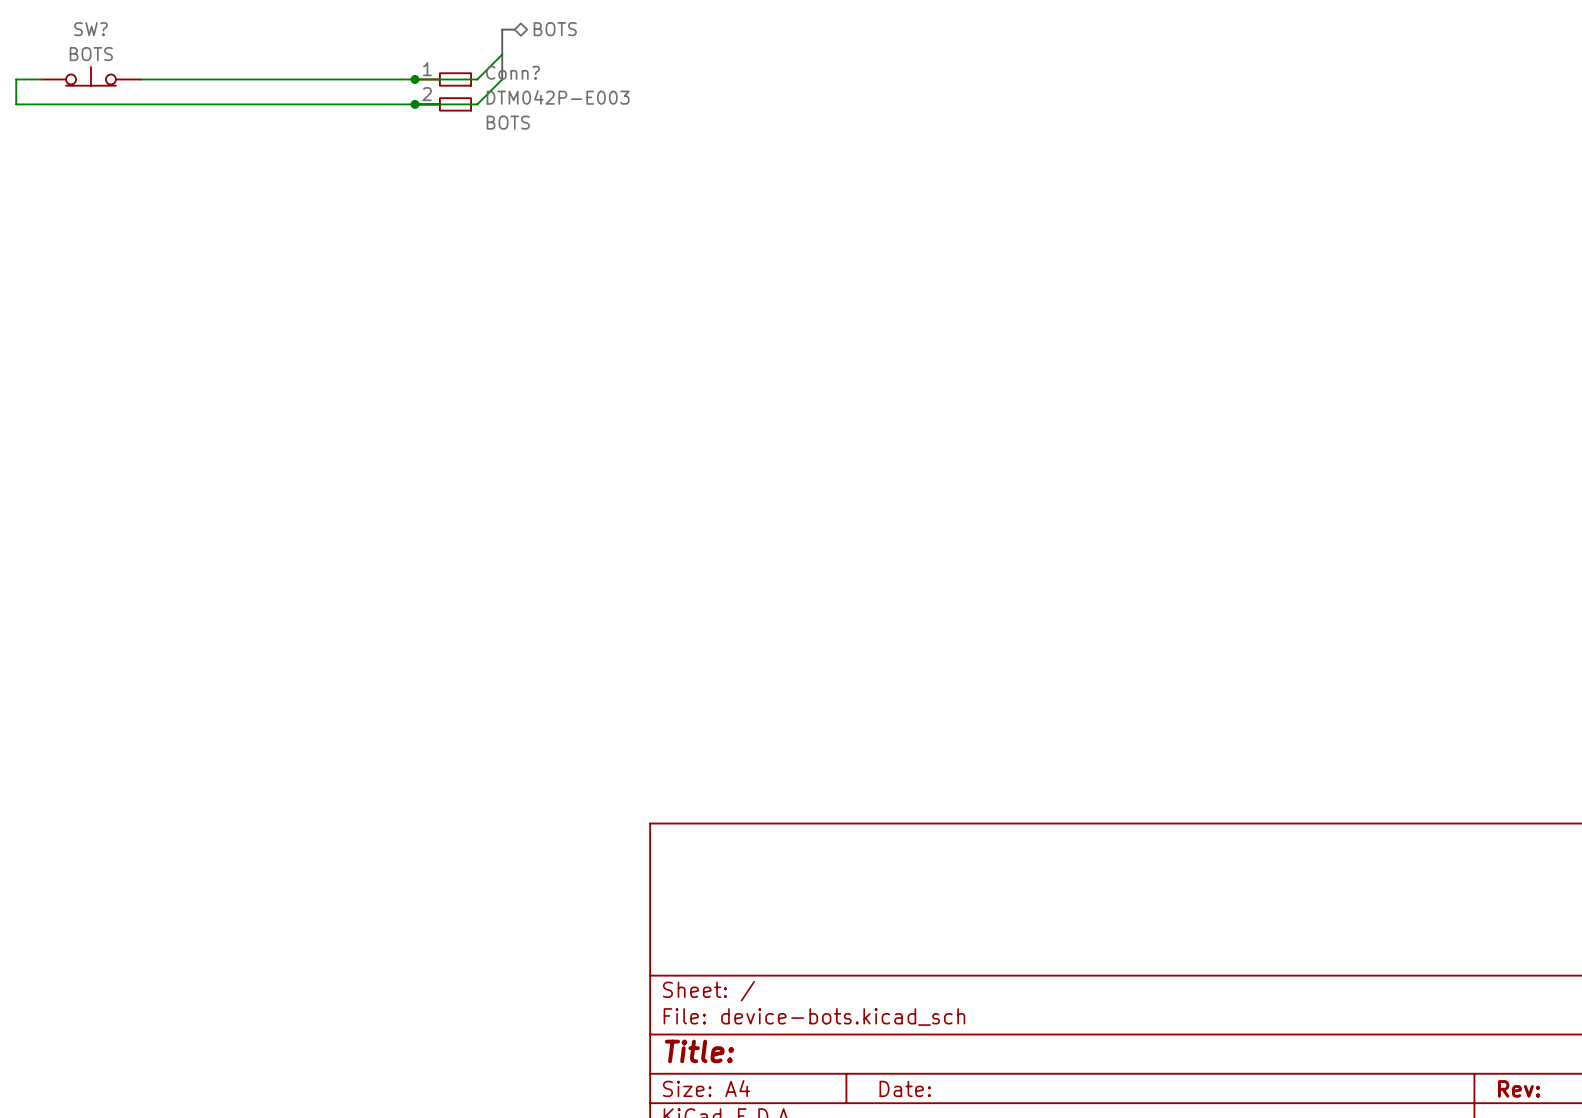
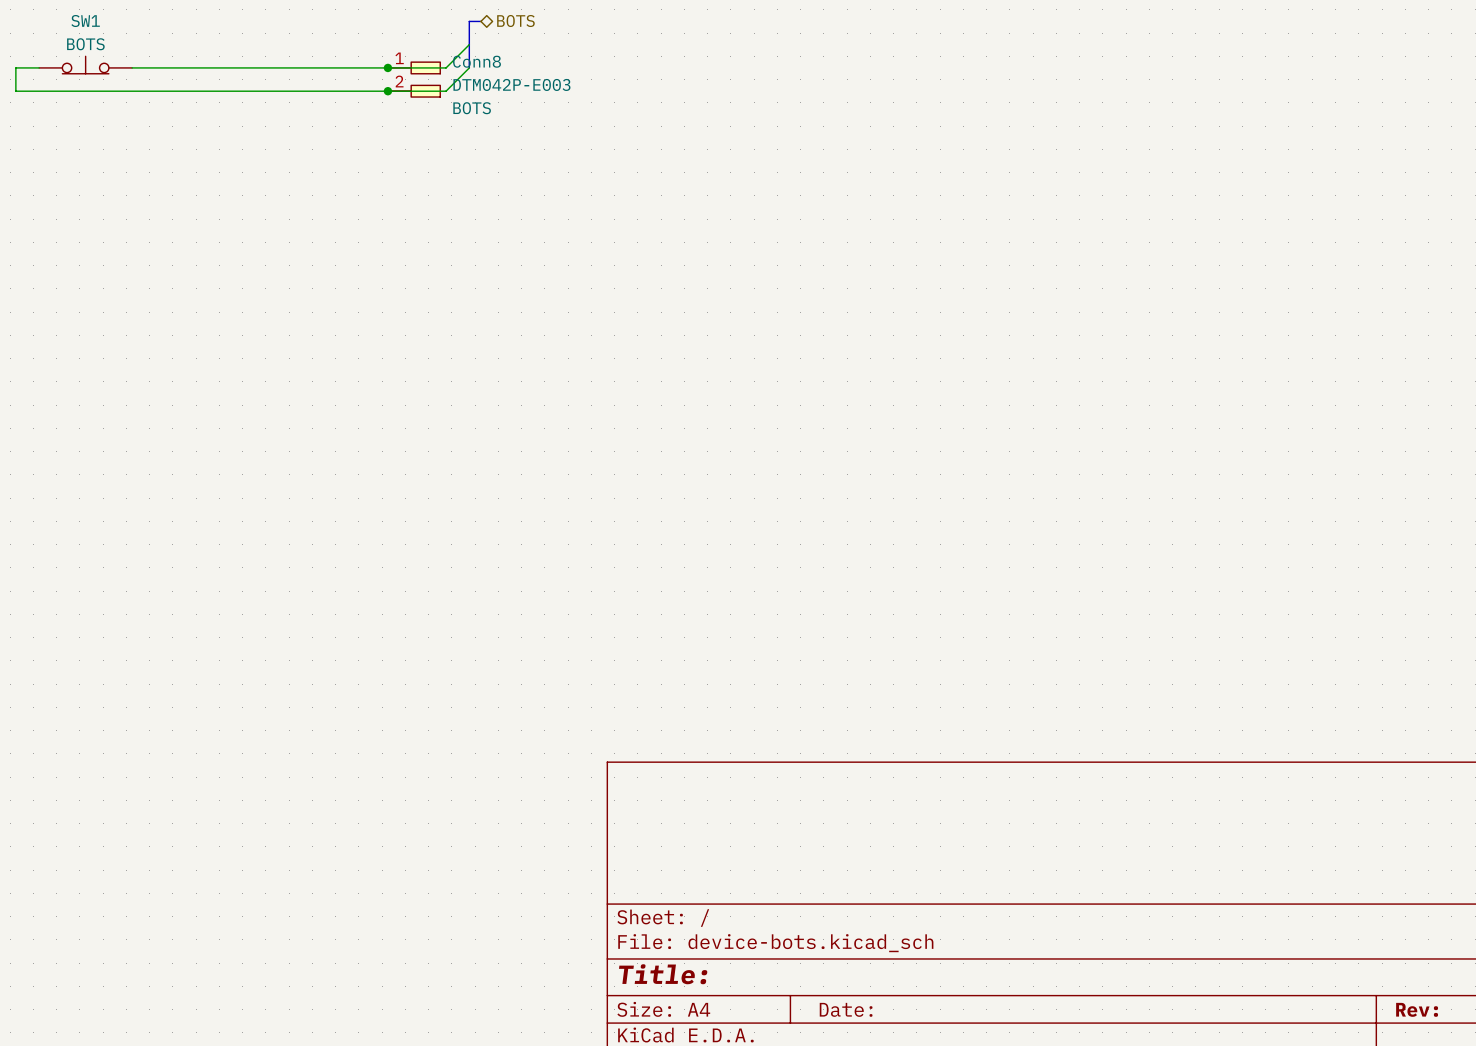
SW? name: SW? (90, 29) -> SW1 (85, 21)
Conn? name: Conn? (513, 72) -> Conn8 (476, 61)

